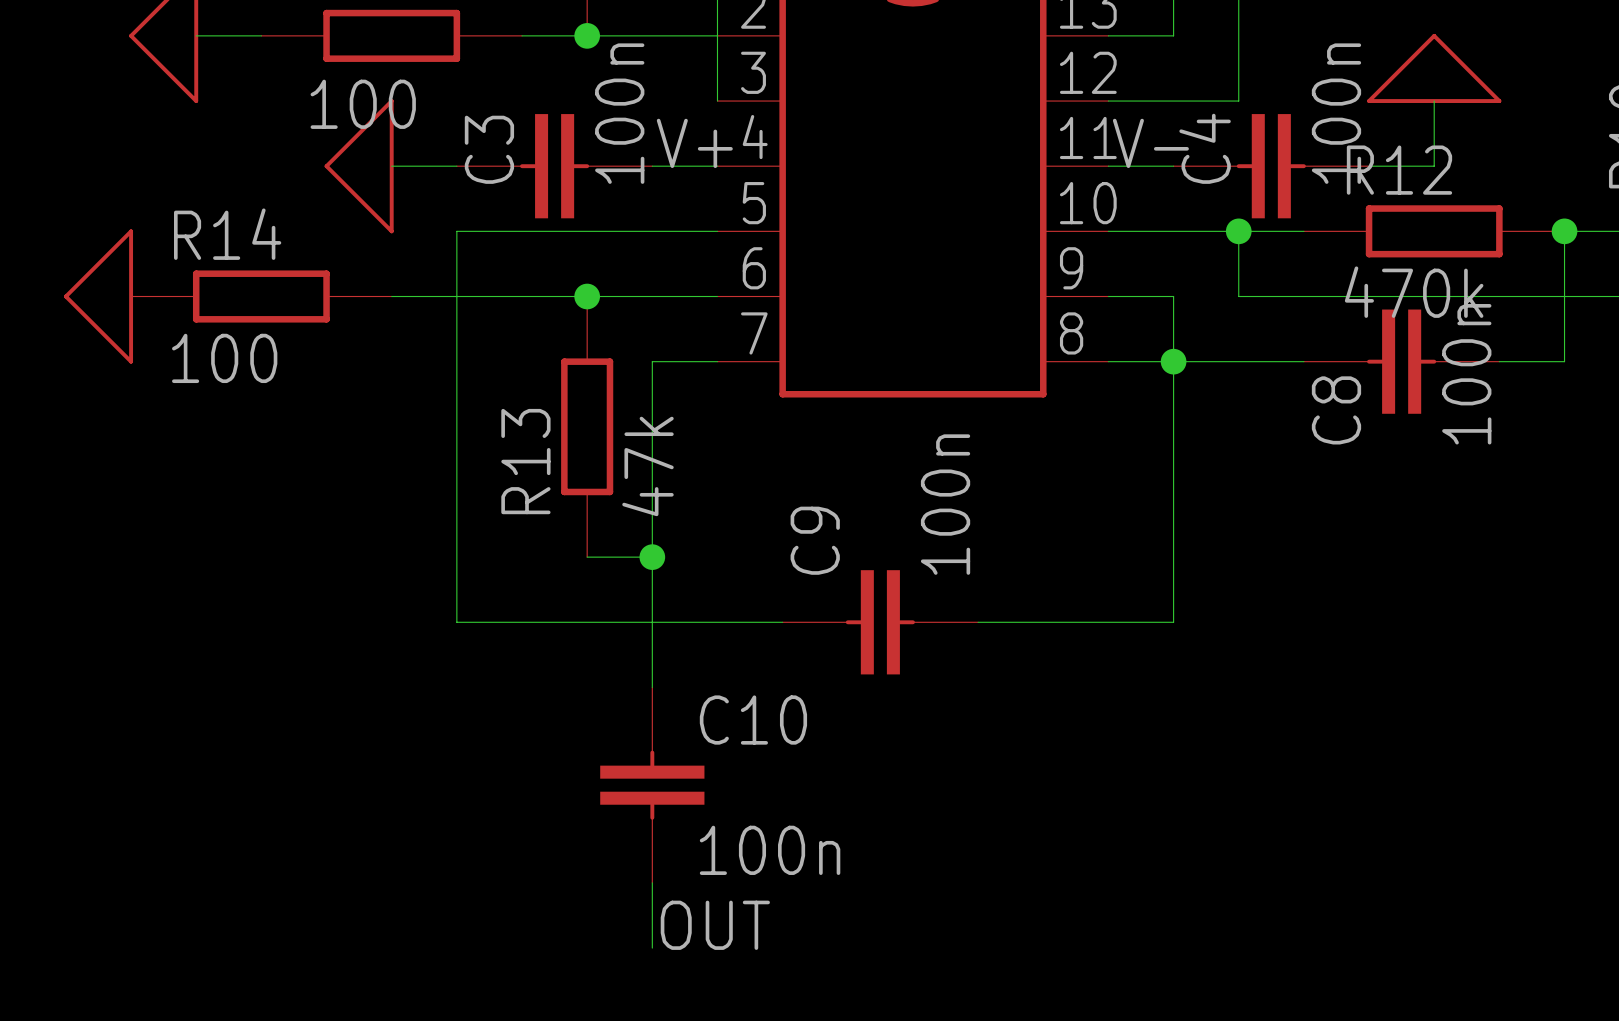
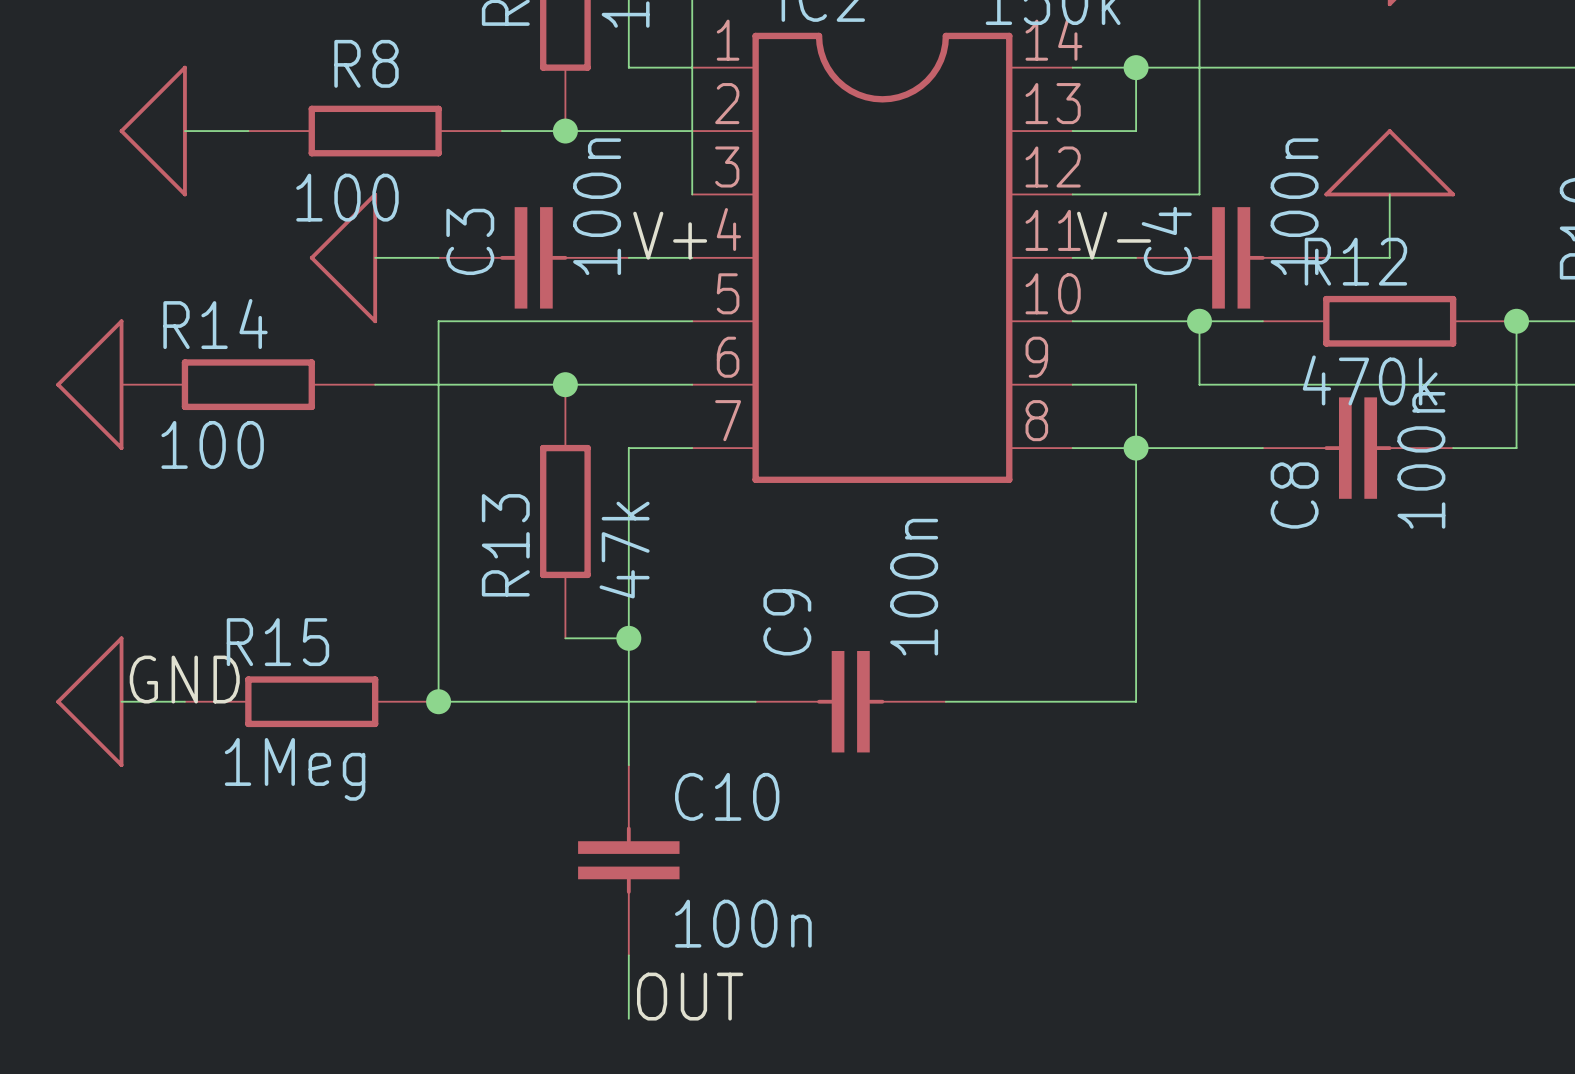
label: none -> GND (184, 679)
power symbol: none -> (89, 701)
wire: none -> (121, 701) (184, 701)
R15: none -> 1Meg (311, 701)
junction: none -> (438, 701)

